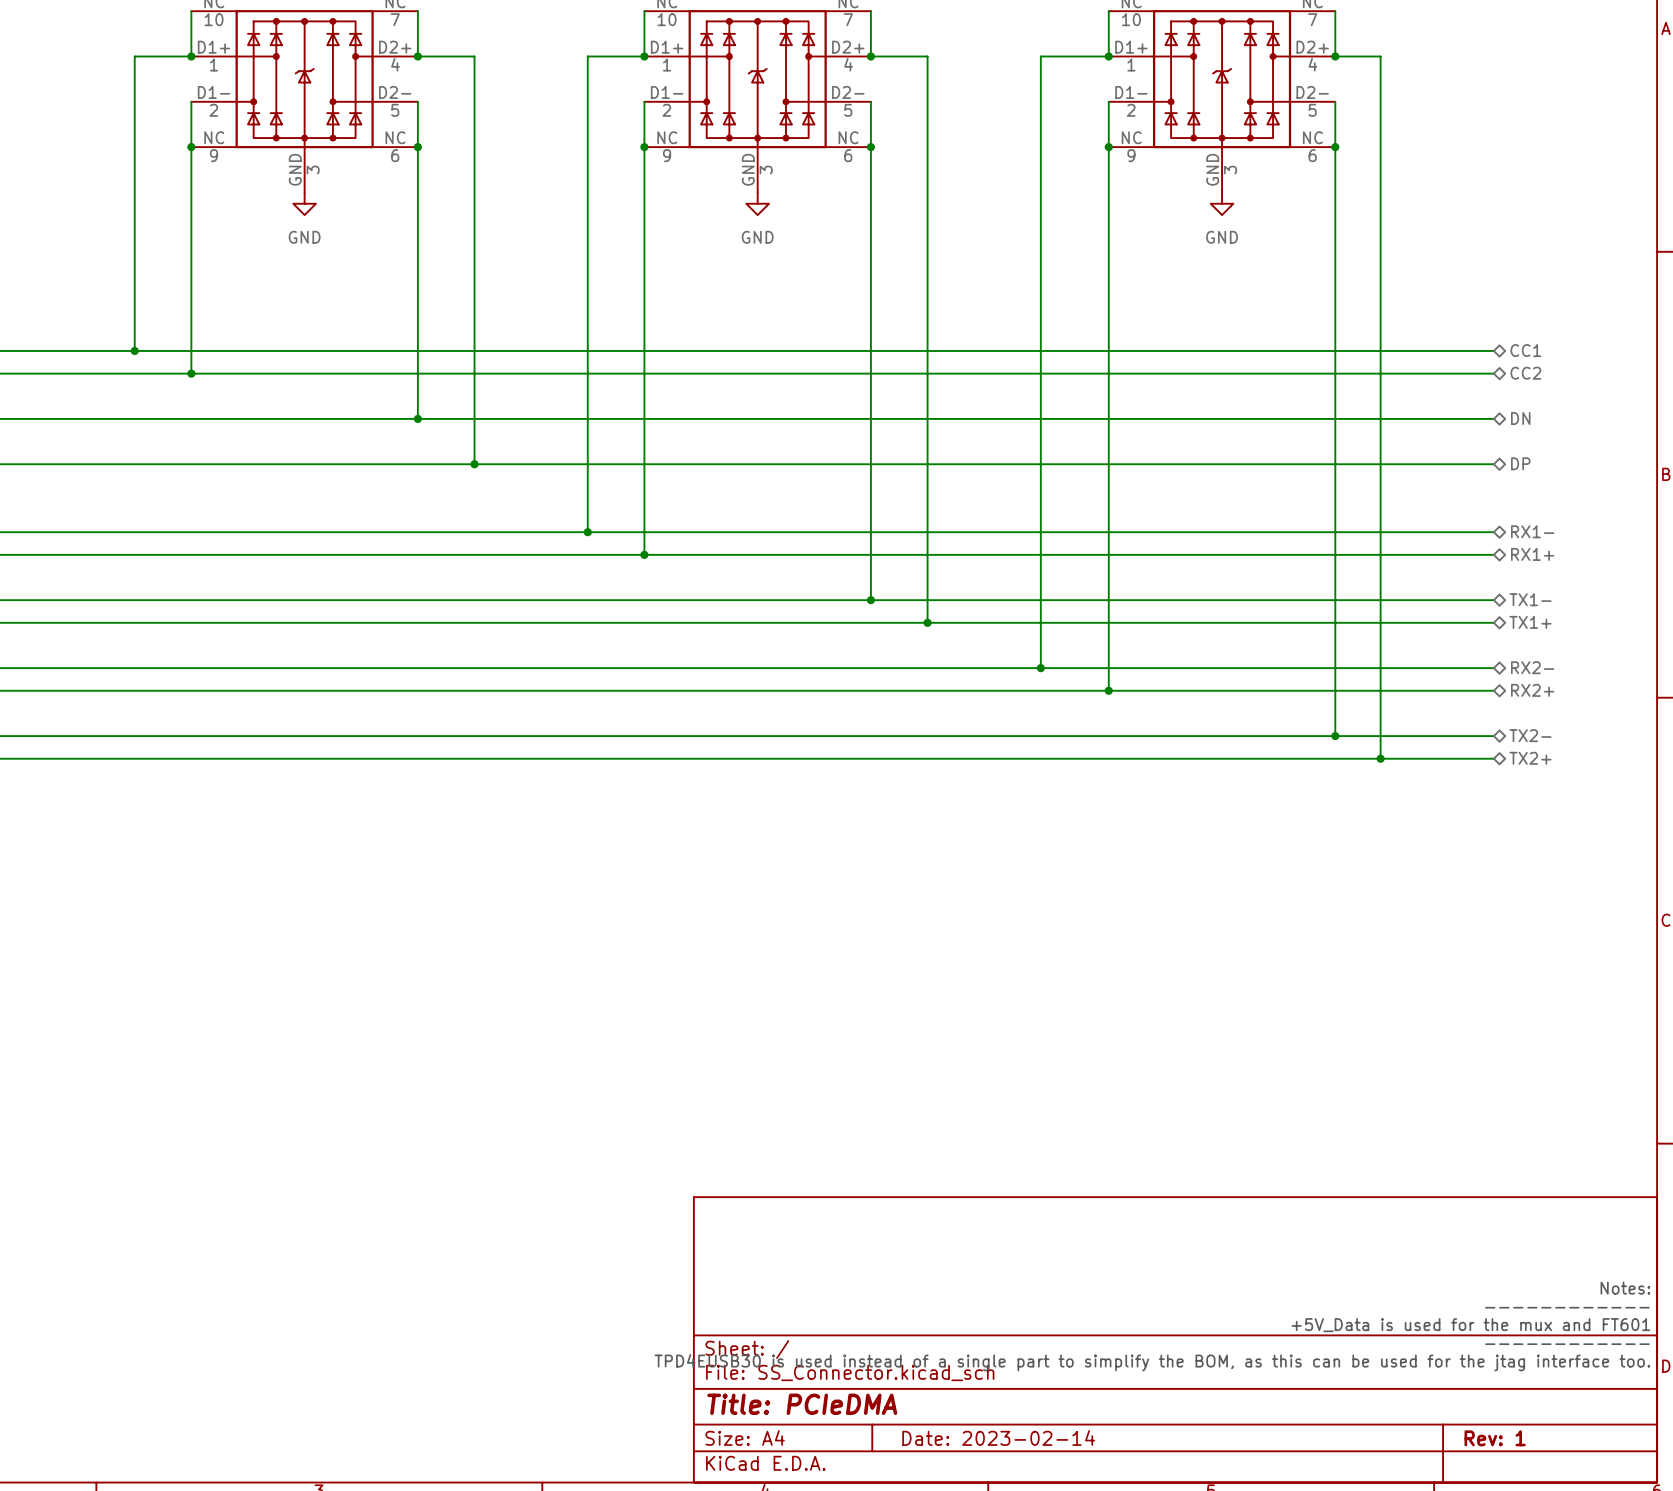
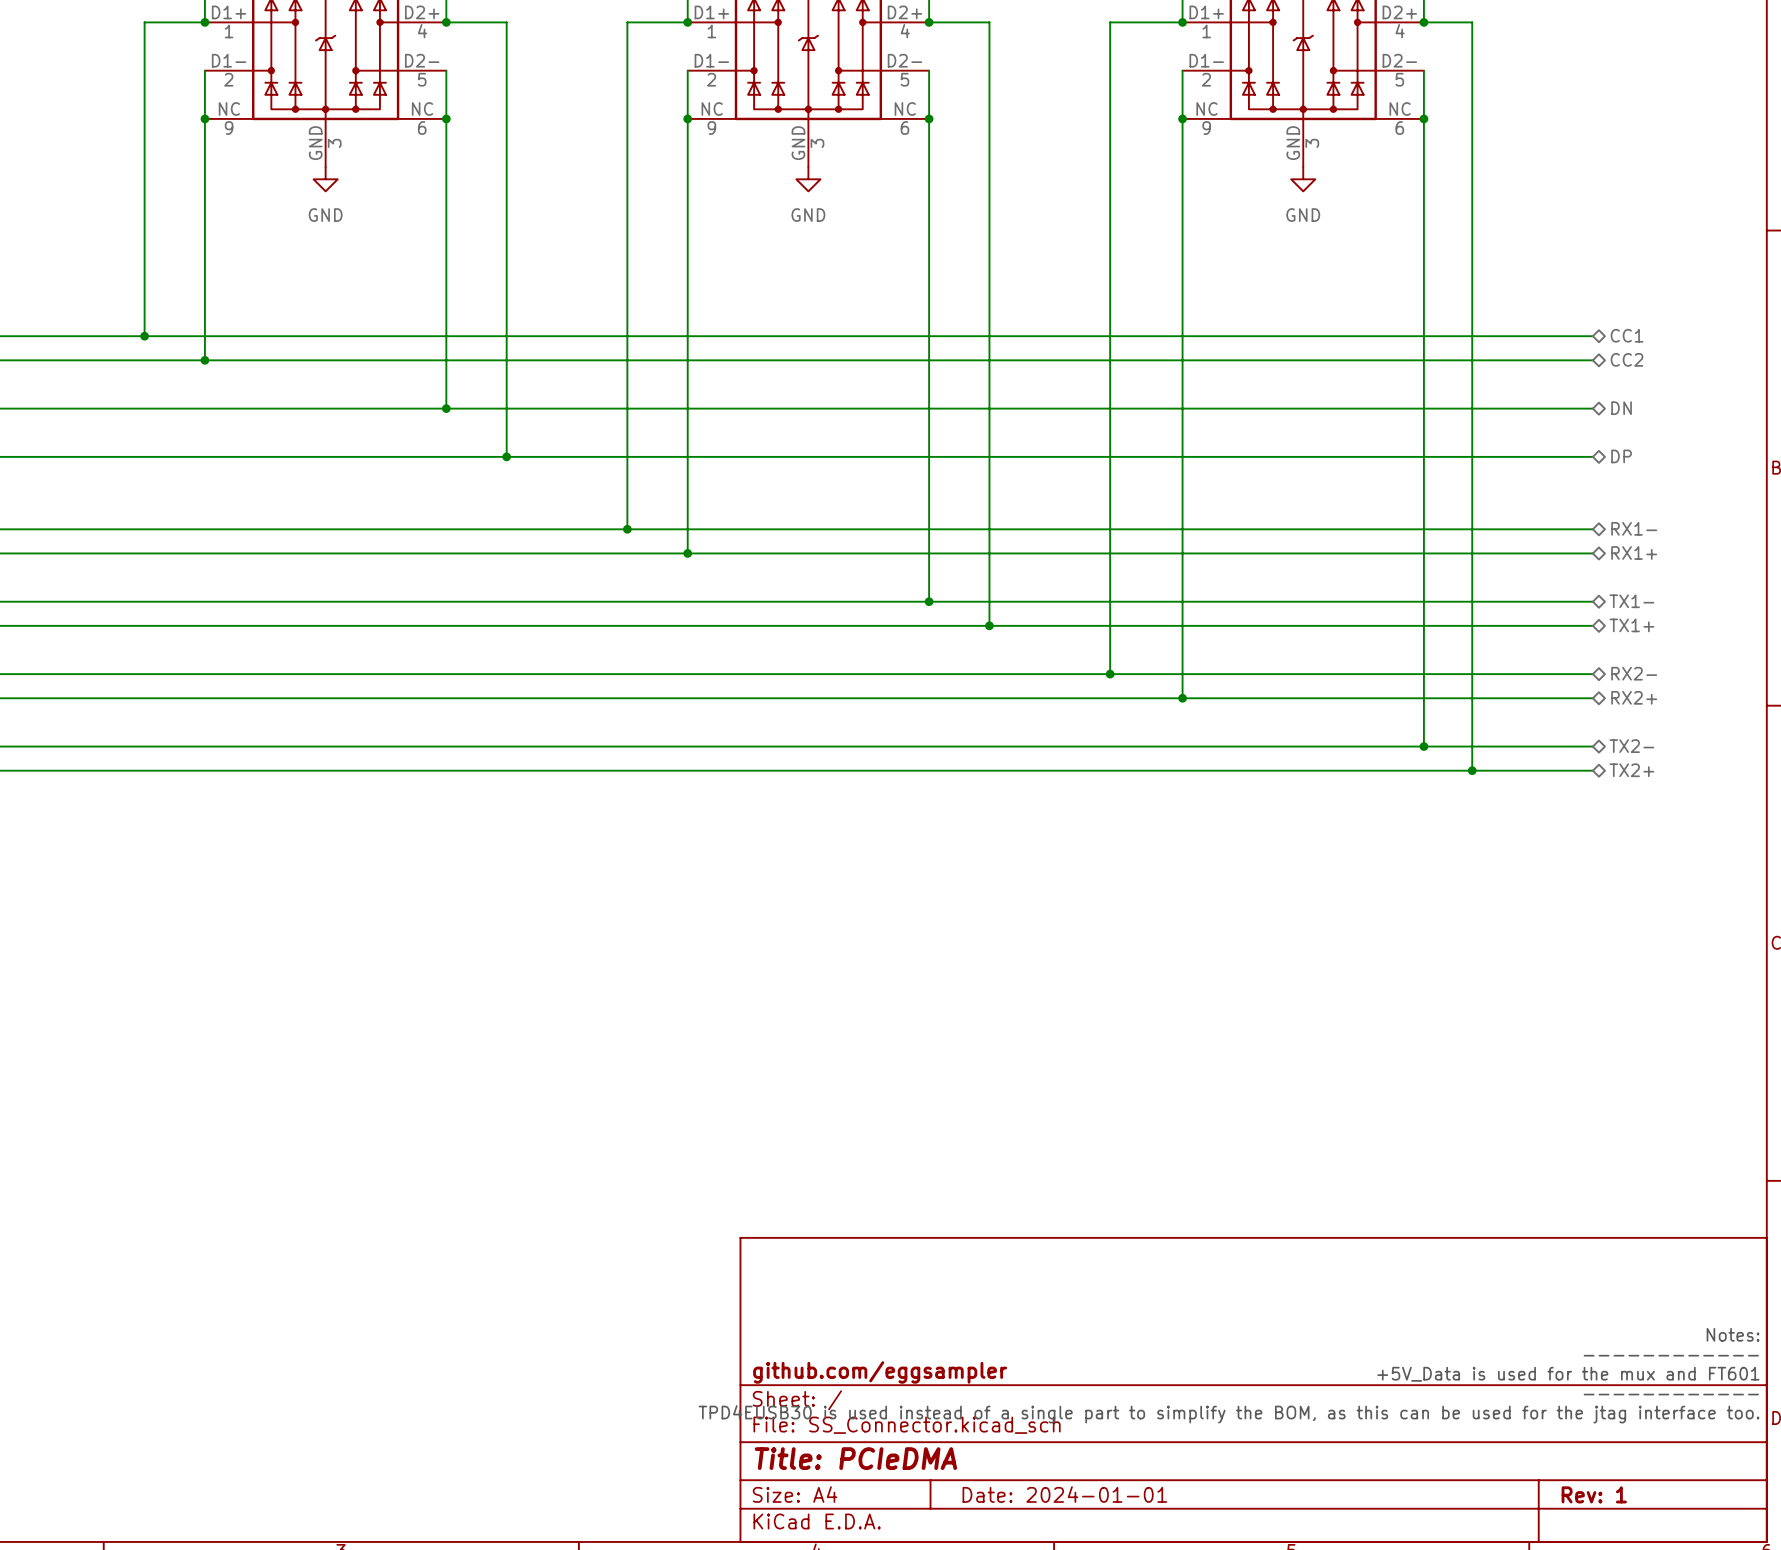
title block: none -> github.com/eggsampler (880, 1372)
title block: Date: 2023-02-14 (998, 1438) -> Date: 2024-01-01 (1064, 1494)

